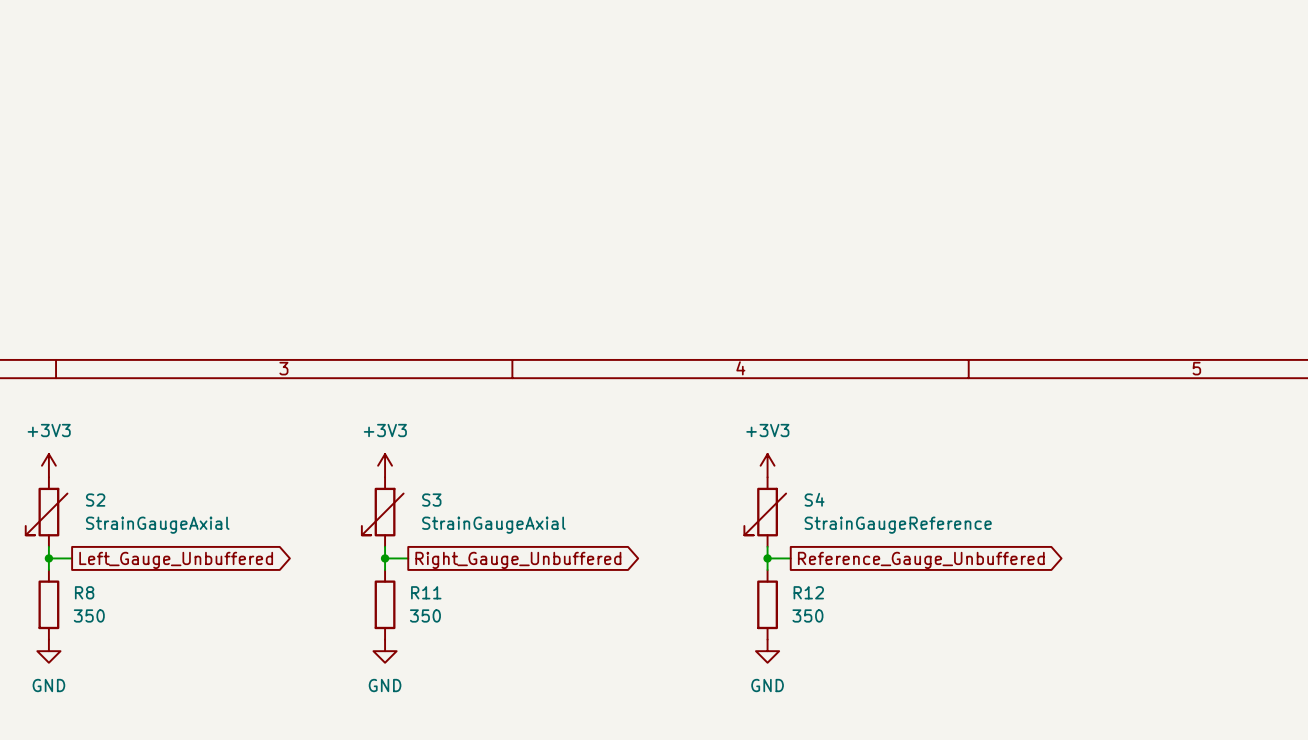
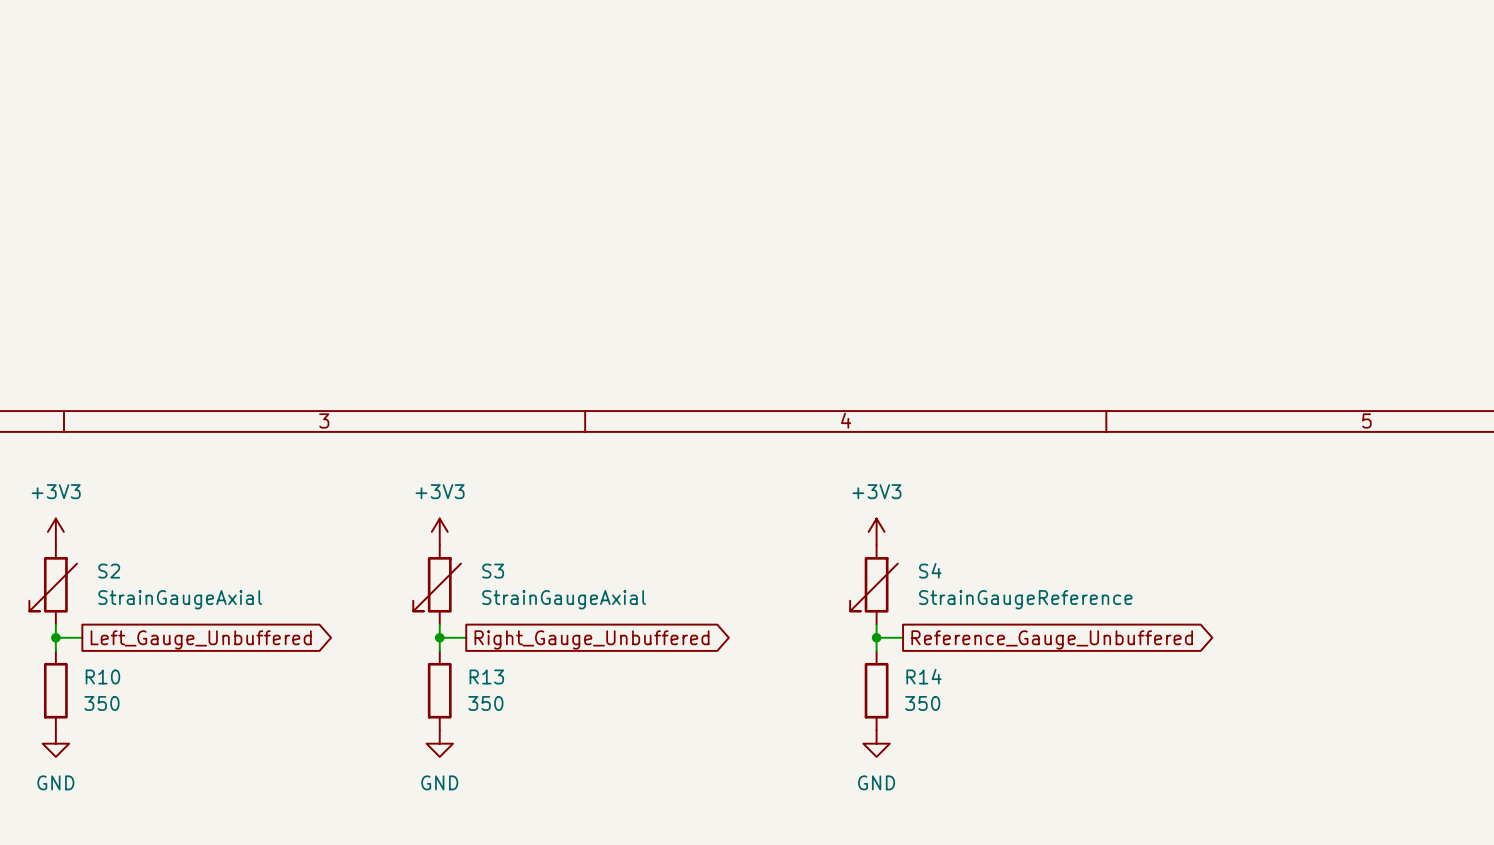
R8 name: R8 (84, 592) -> R10 (102, 676)
R11 name: R11 (426, 592) -> R13 (486, 676)
R12 name: R12 (808, 592) -> R14 (923, 676)

